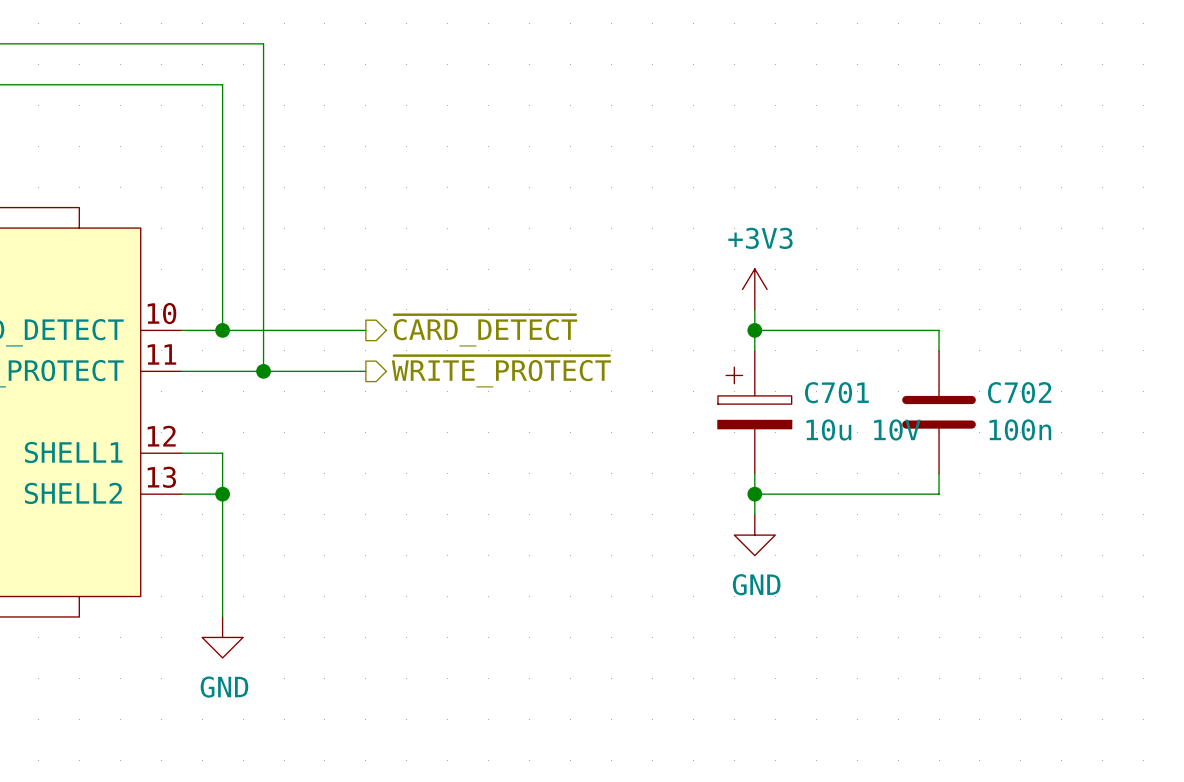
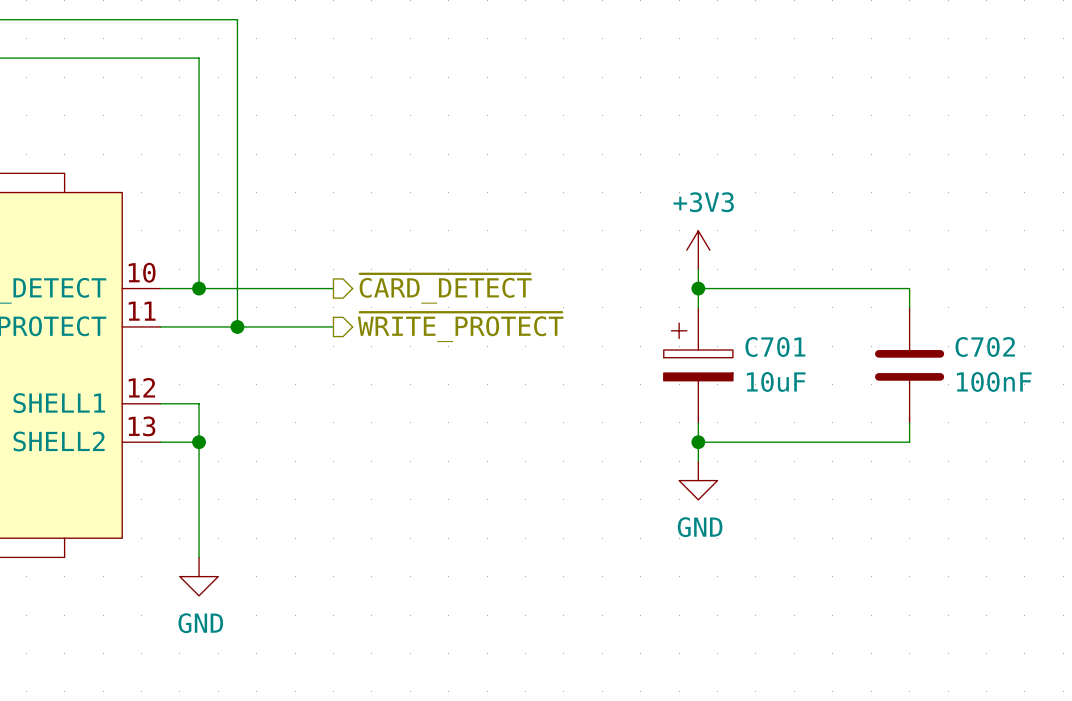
wire: (939, 330) (939, 350) -> (871, 288) (909, 288) (909, 307)
C702 position: (939, 412) -> (909, 365)
C701 value: 10u 10V (863, 429) -> 10uF (776, 381)
C702 value: 100n (1020, 429) -> 100nF (994, 381)
wire: (939, 473) (939, 494) -> (909, 422) (909, 442) (871, 442)

